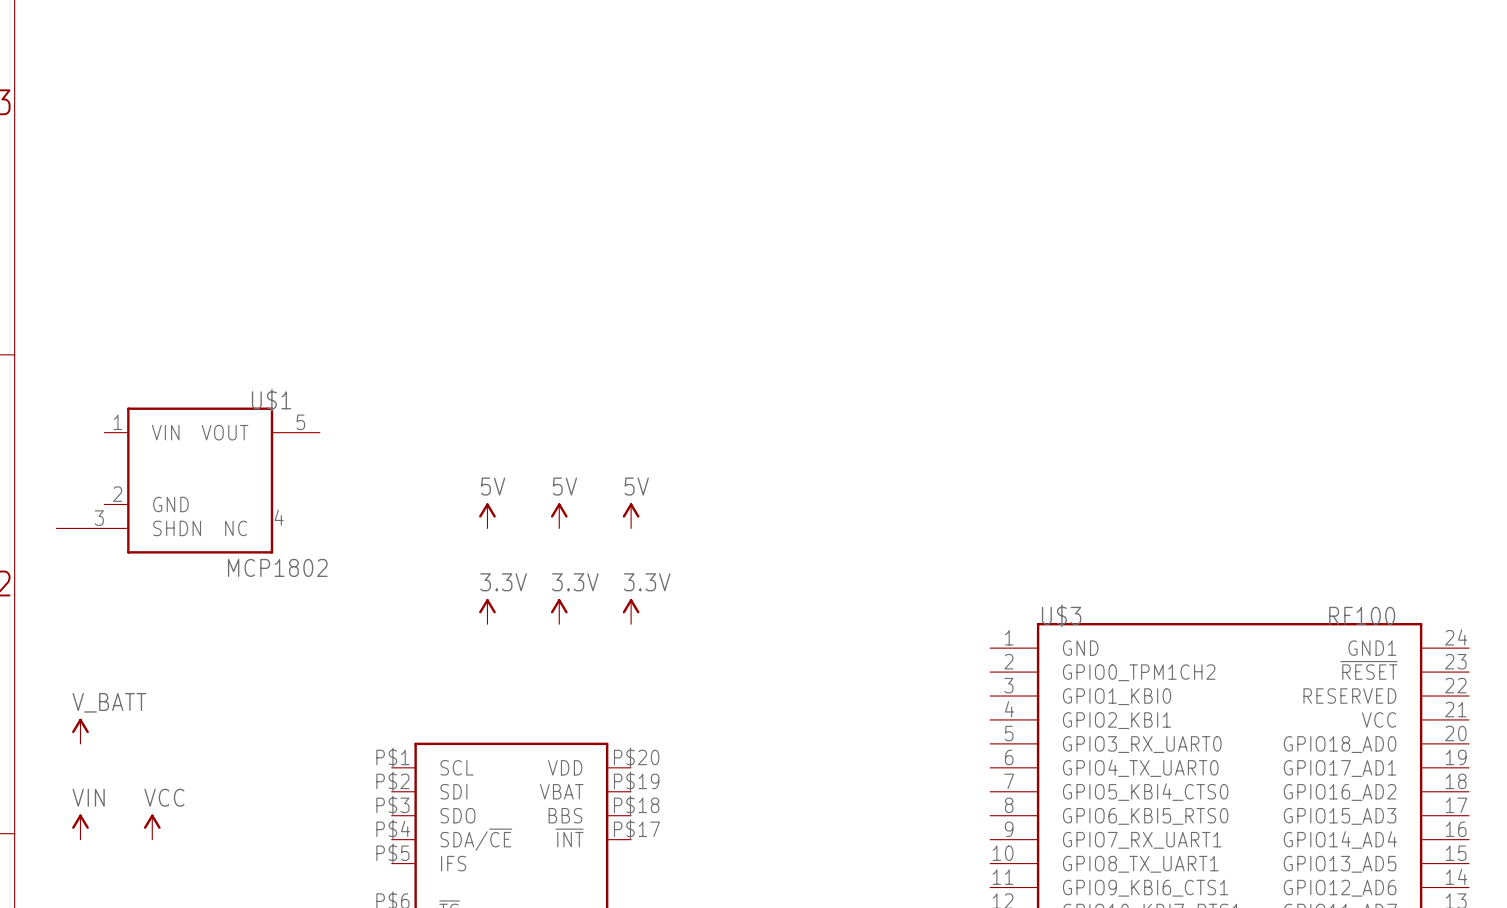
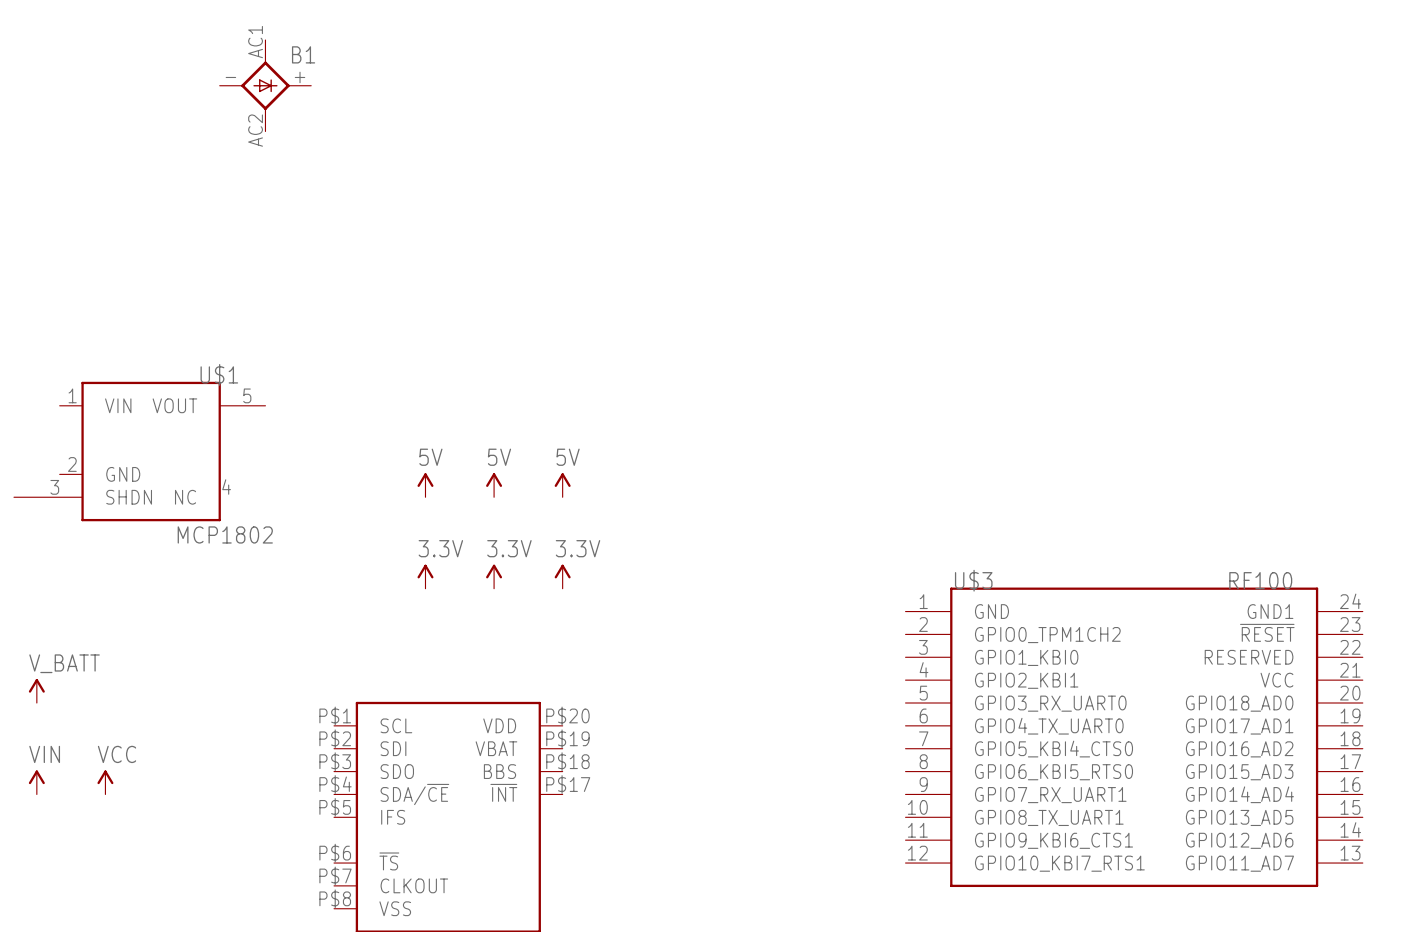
B1: none -> (265, 85)

